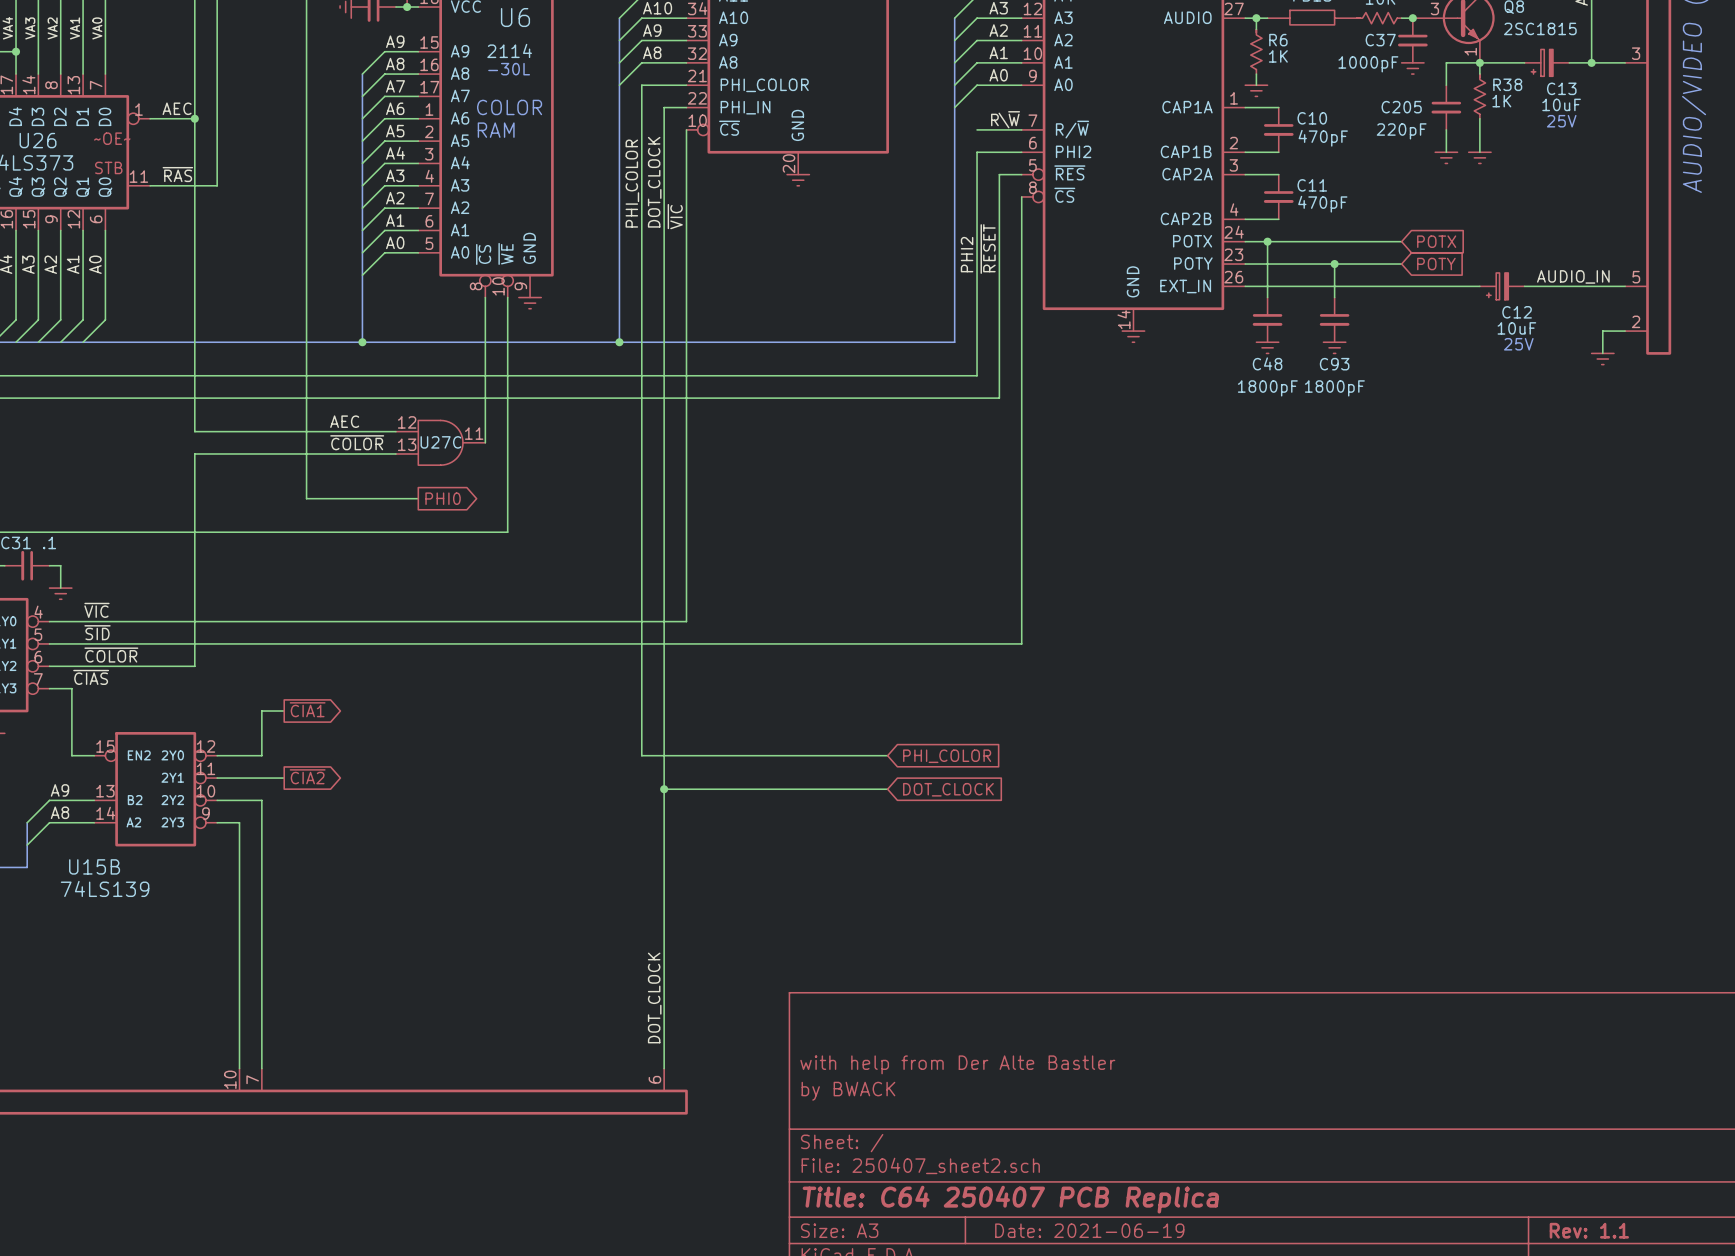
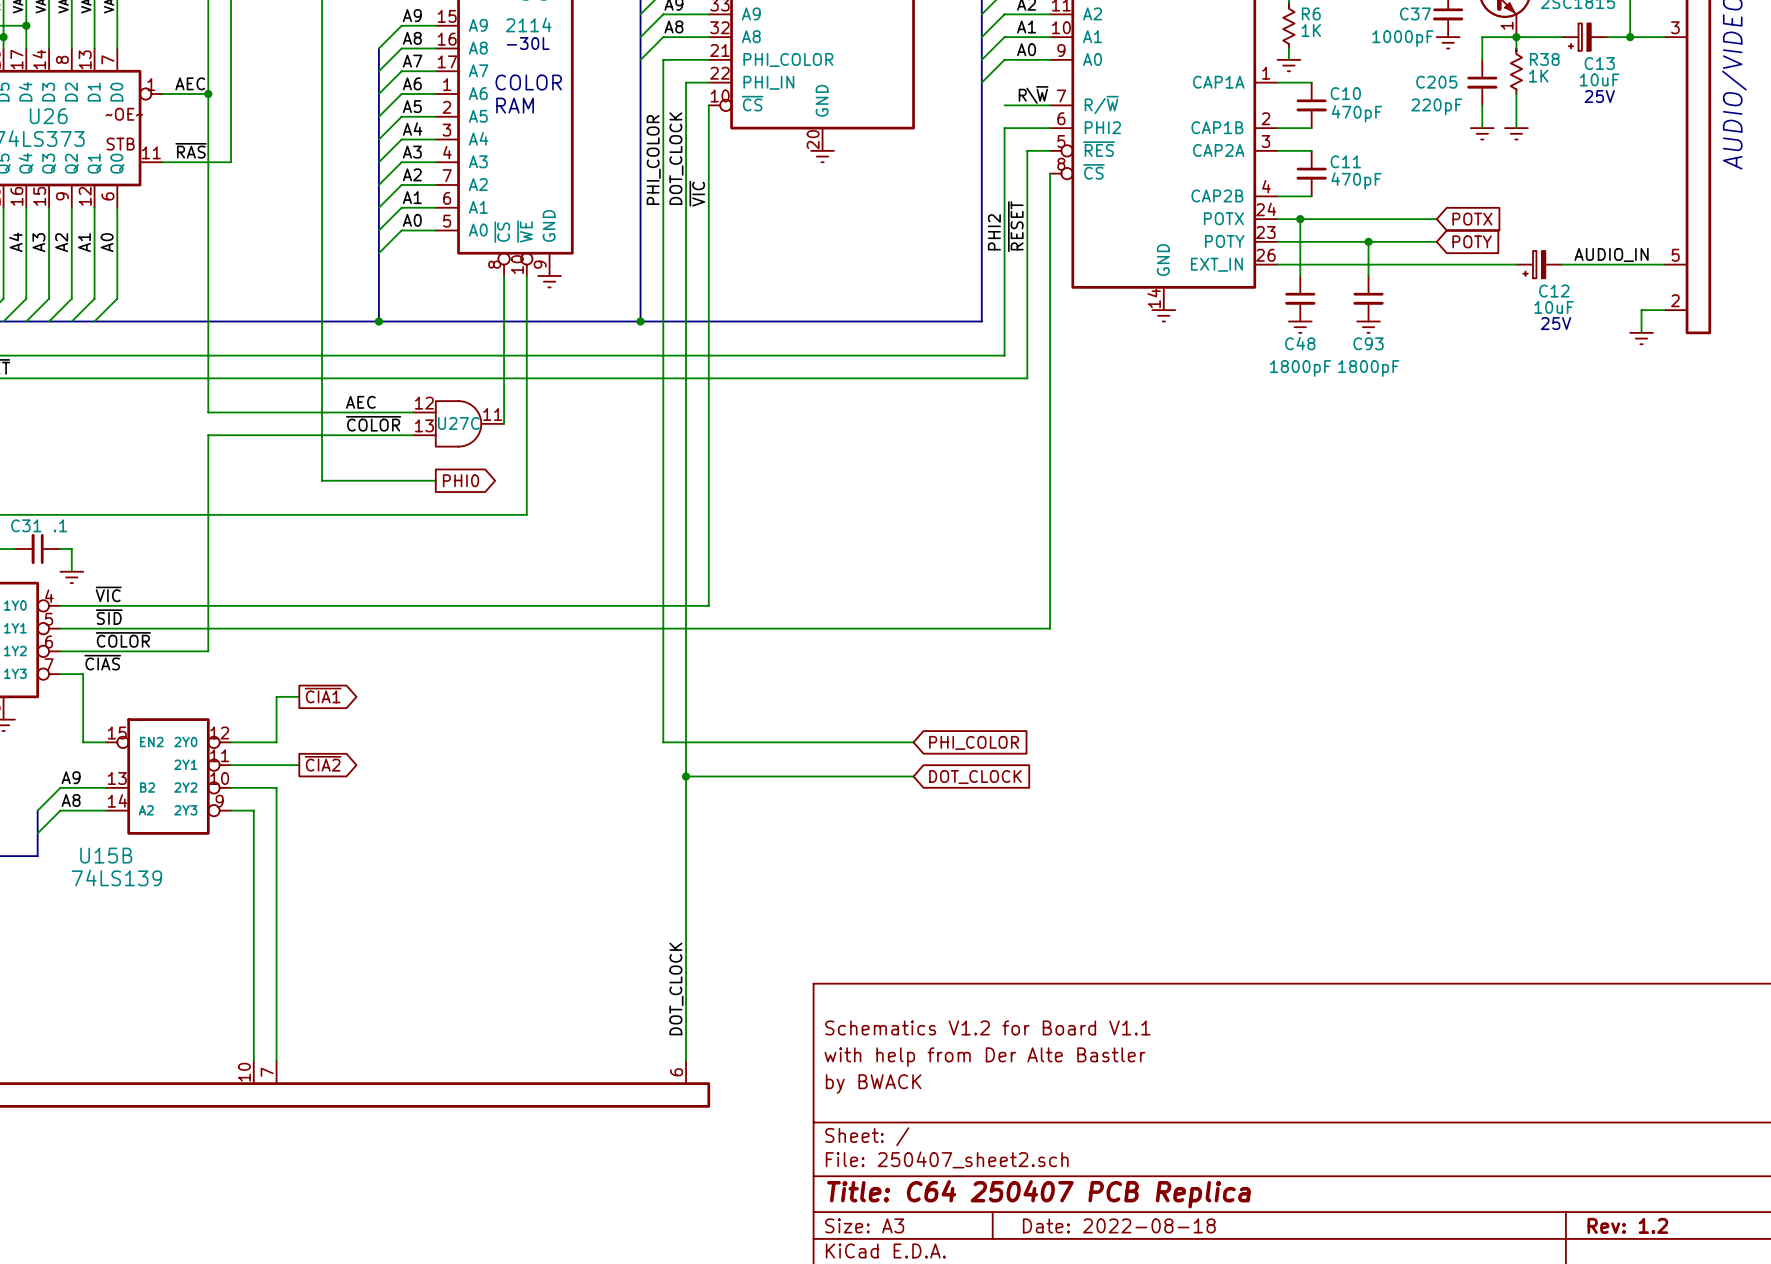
title block: none -> Schematics V1.2 for Board V1.1 (987, 1027)
title block: Date: 2021-06-19 (1089, 1230) -> Date: 2022-08-18 (1119, 1225)
title block: Rev: 1.1 (1589, 1230) -> Rev: 1.2 (1627, 1225)

